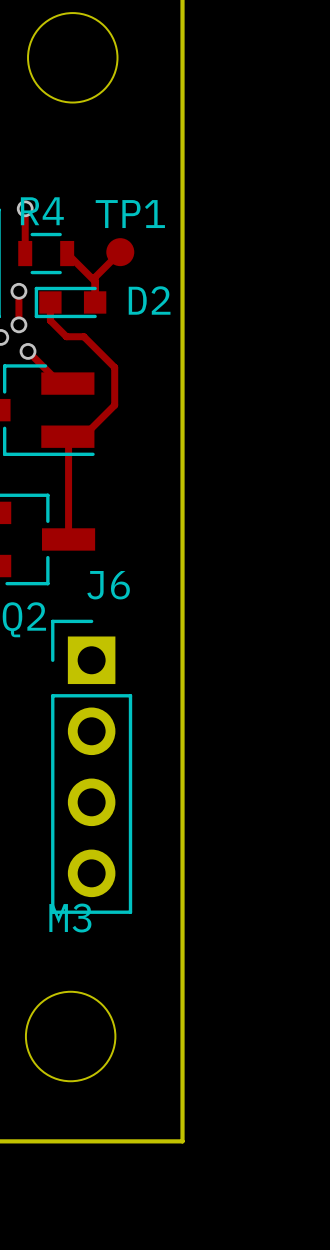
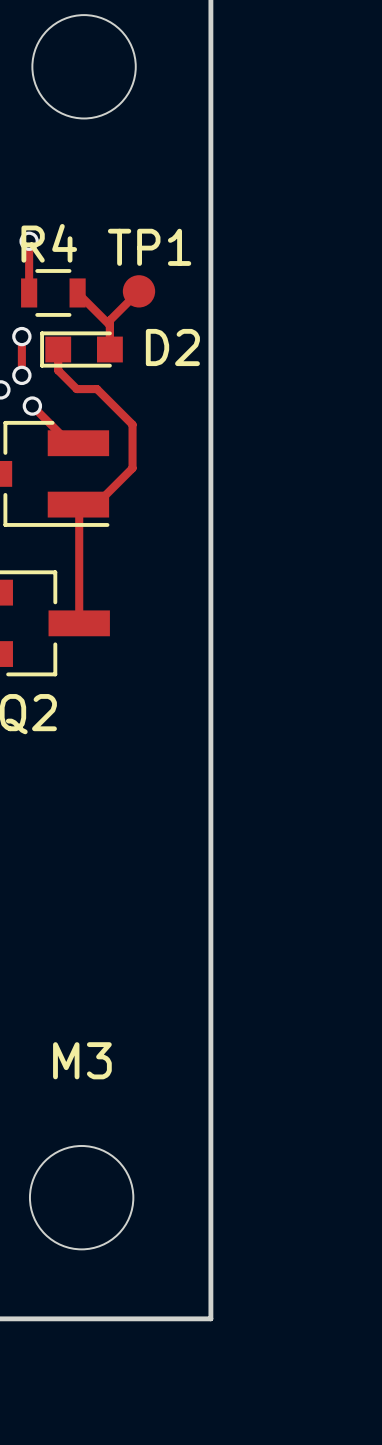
J6: (91, 766) -> none

